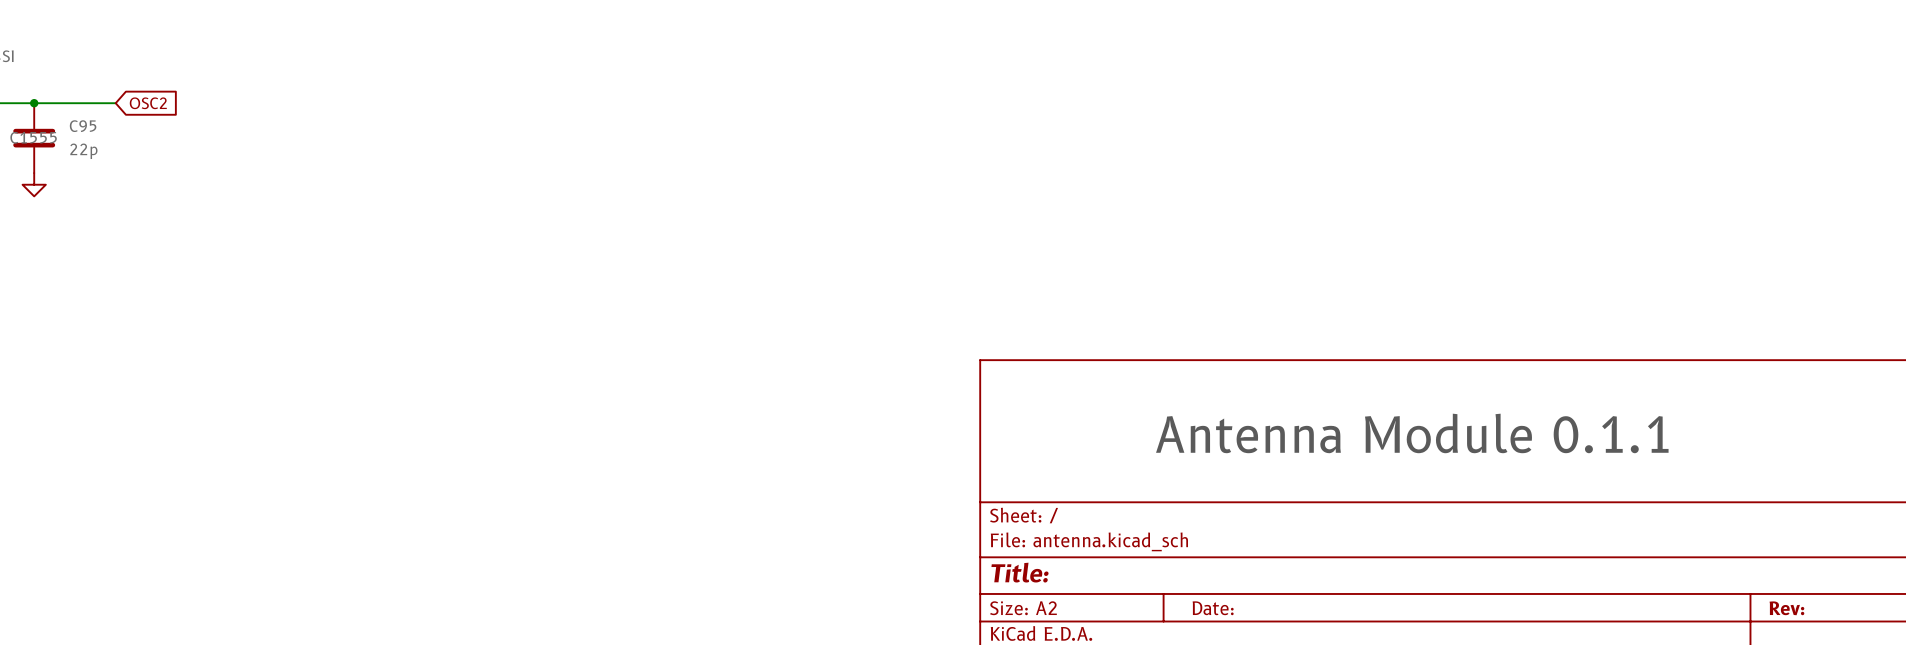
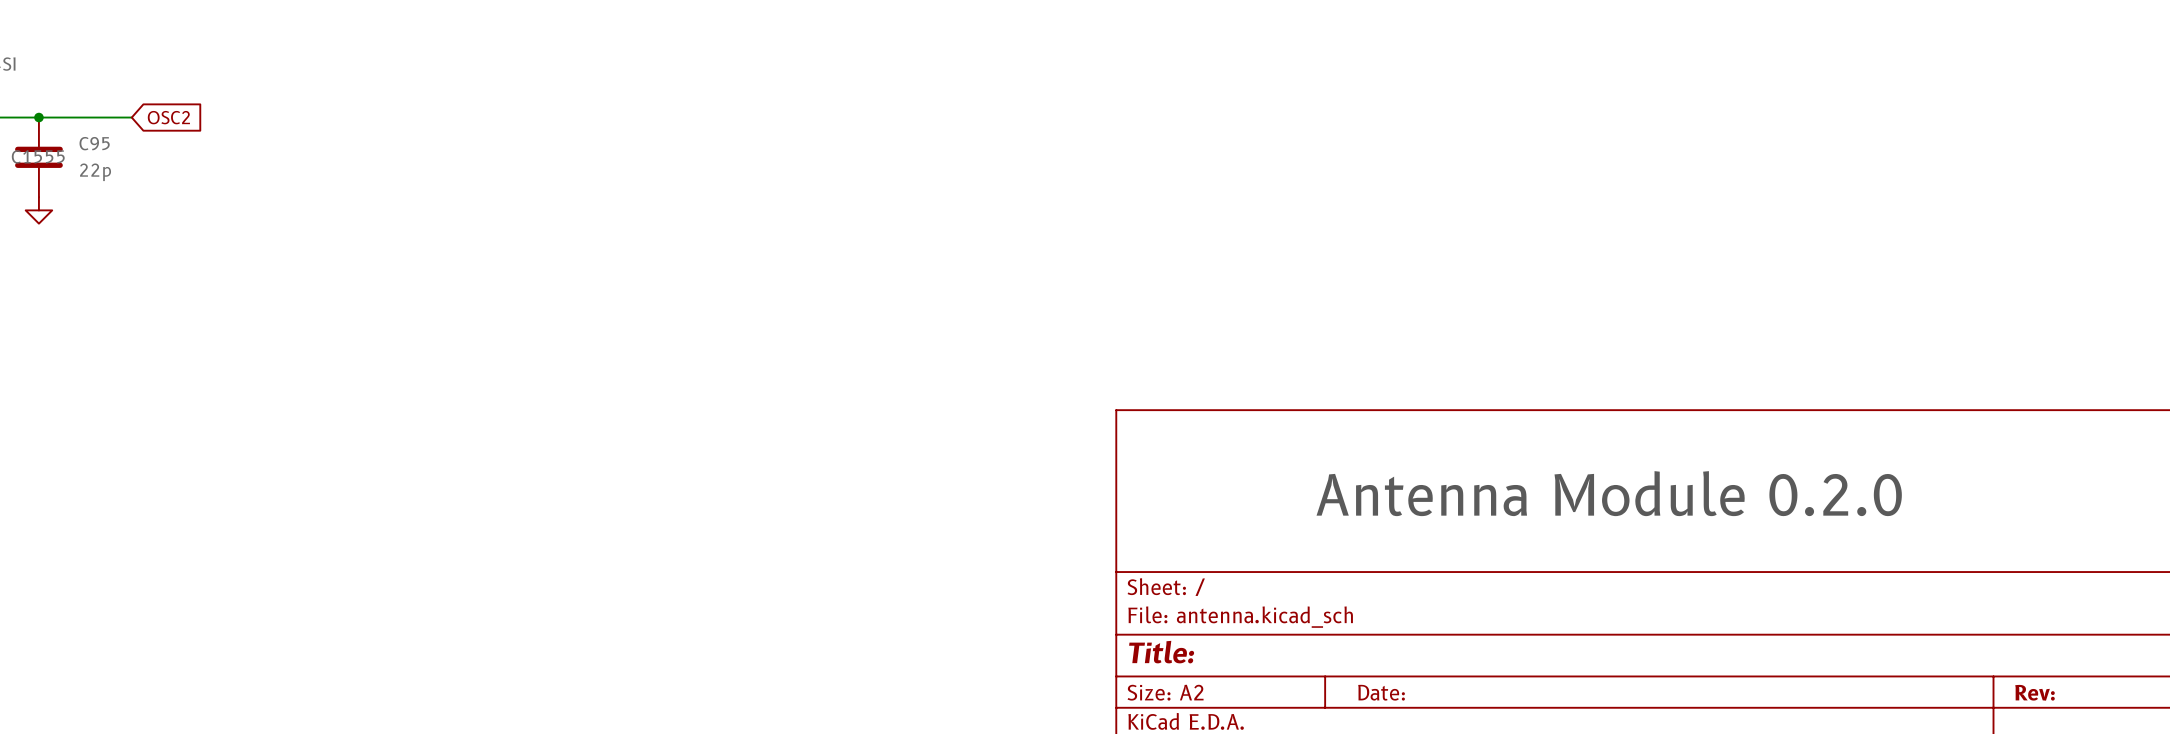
text: Antenna Module 0.1.1 (1412, 433) -> Antenna Module 0.2.0 (1609, 493)

